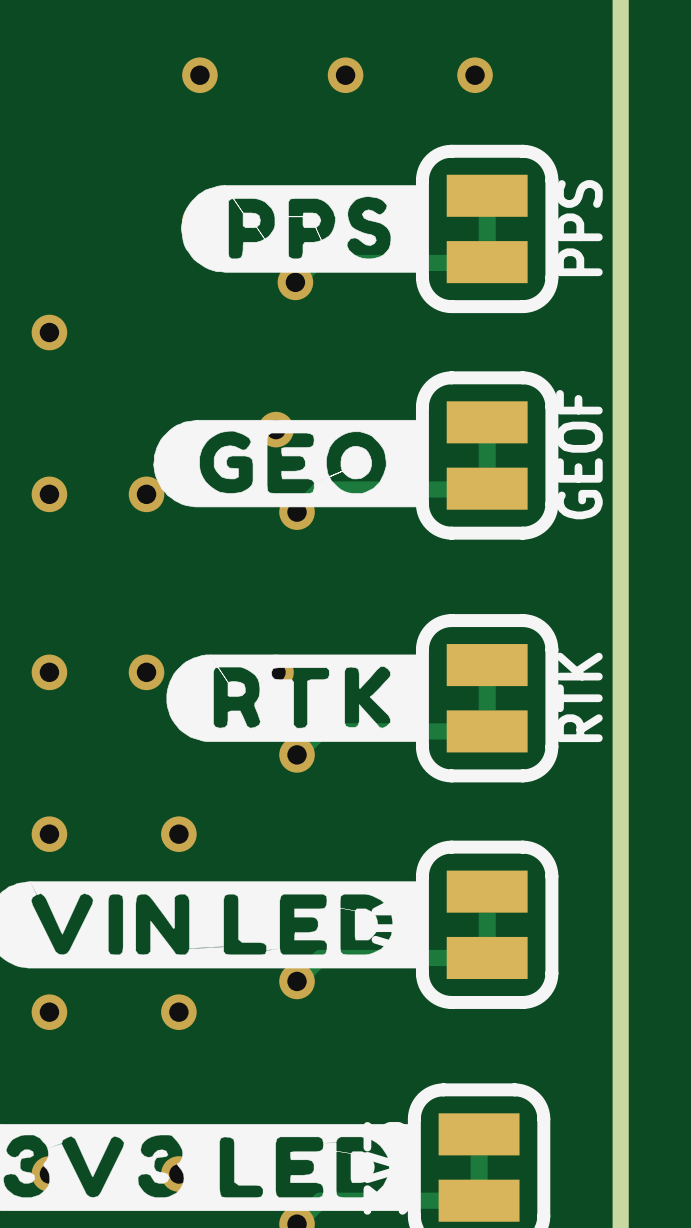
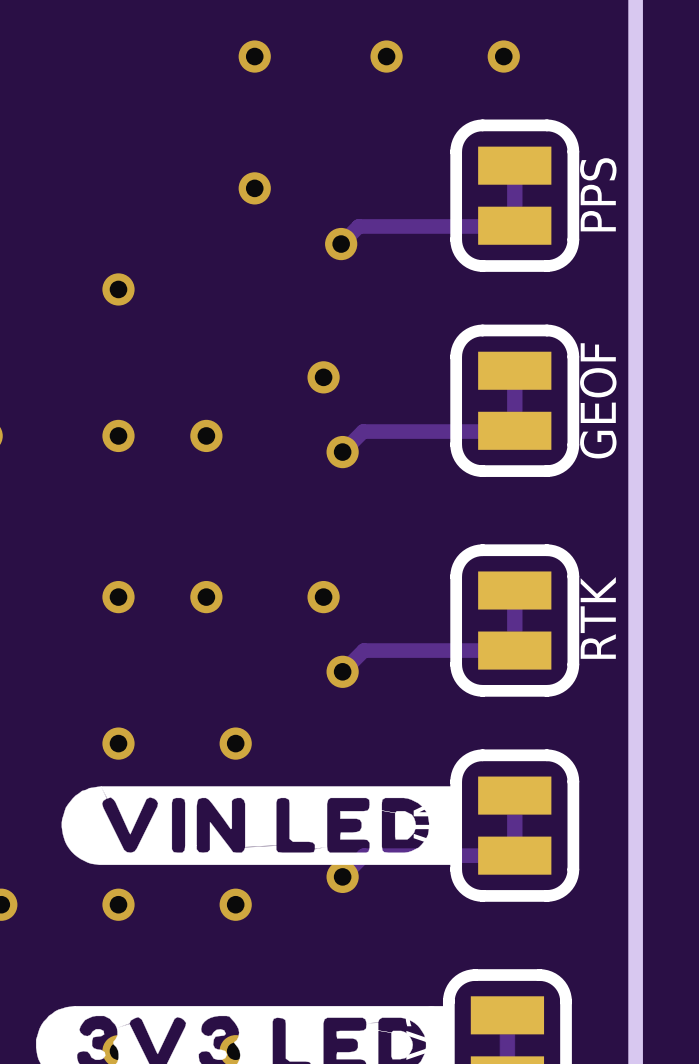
drawing: [181, 185, 424, 273] -> none
drawing: [153, 419, 420, 508] -> none
drawing: [166, 654, 423, 742] -> none

